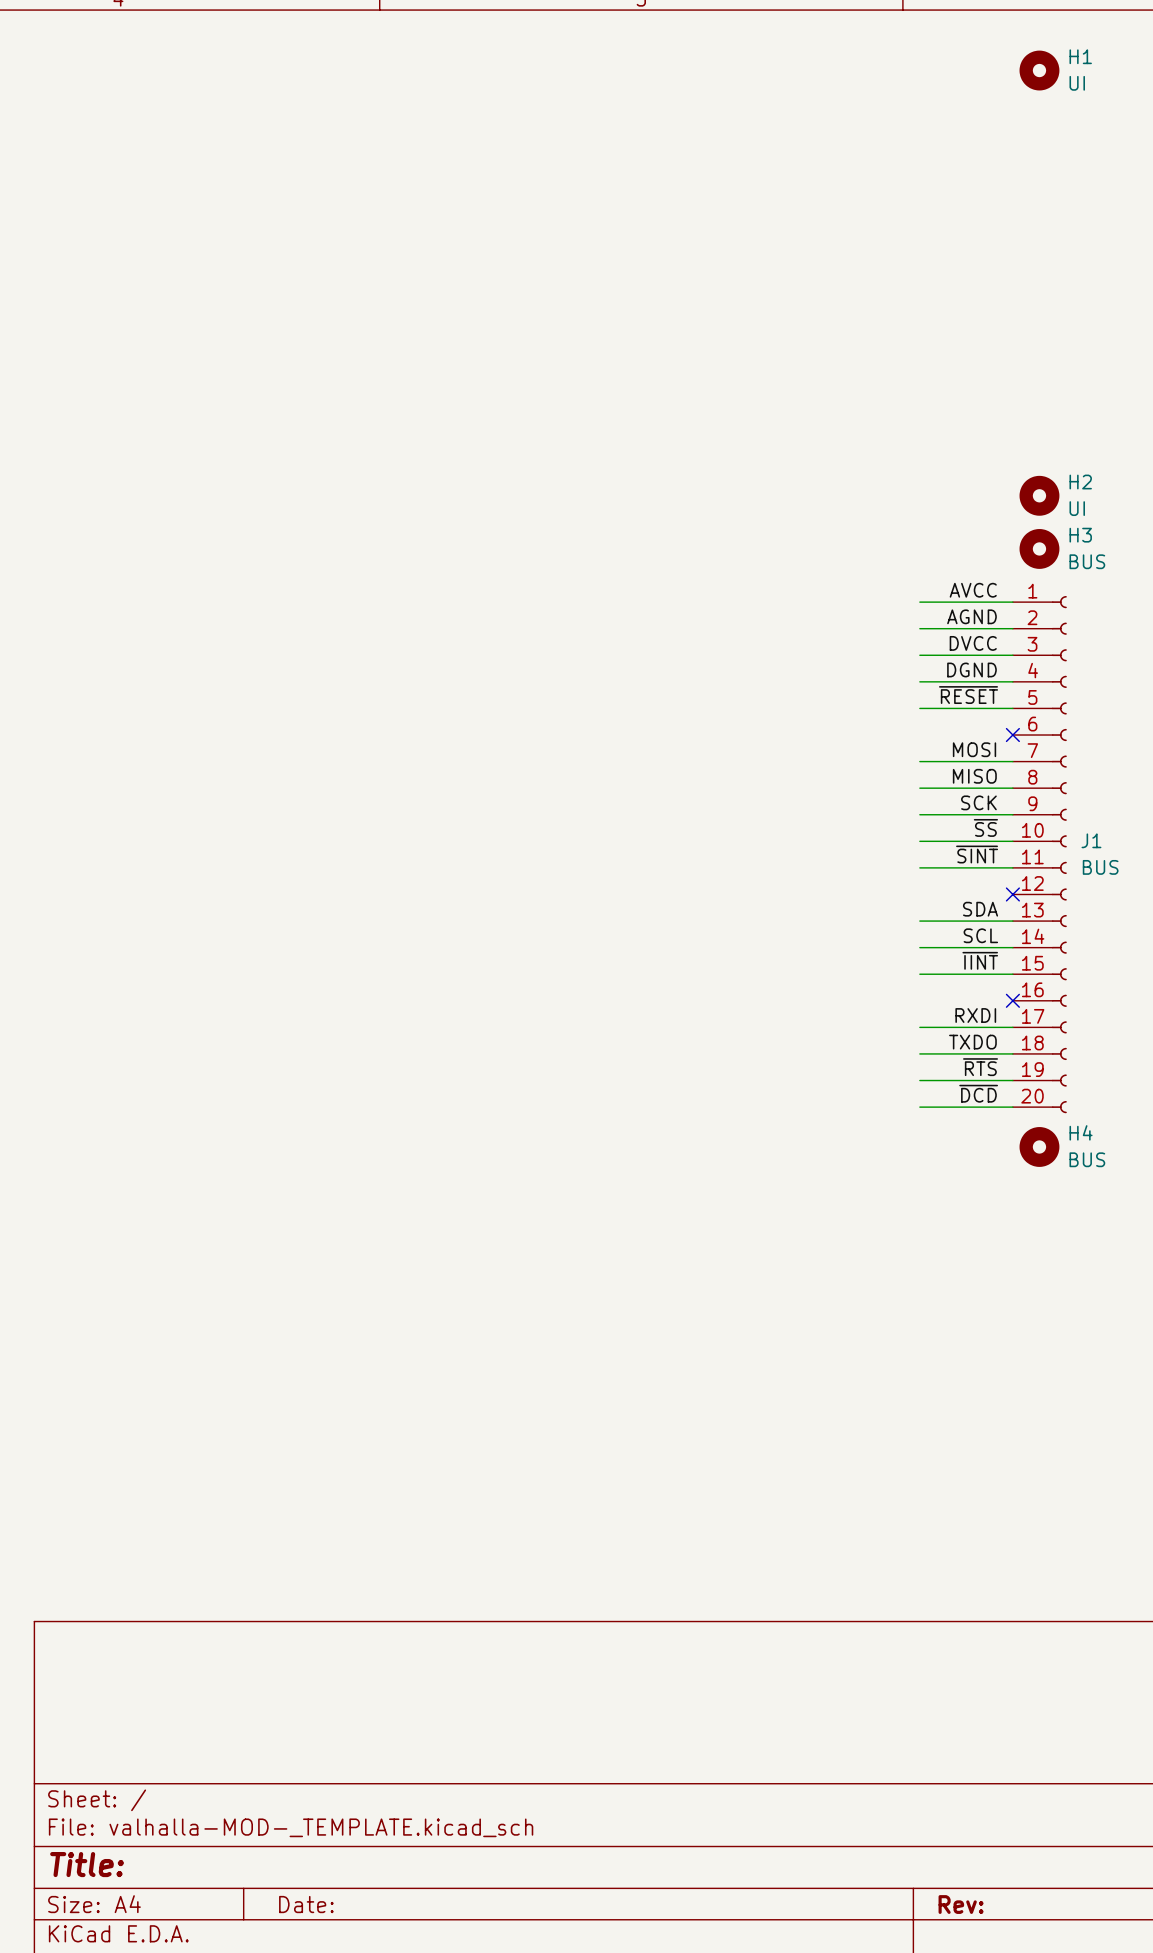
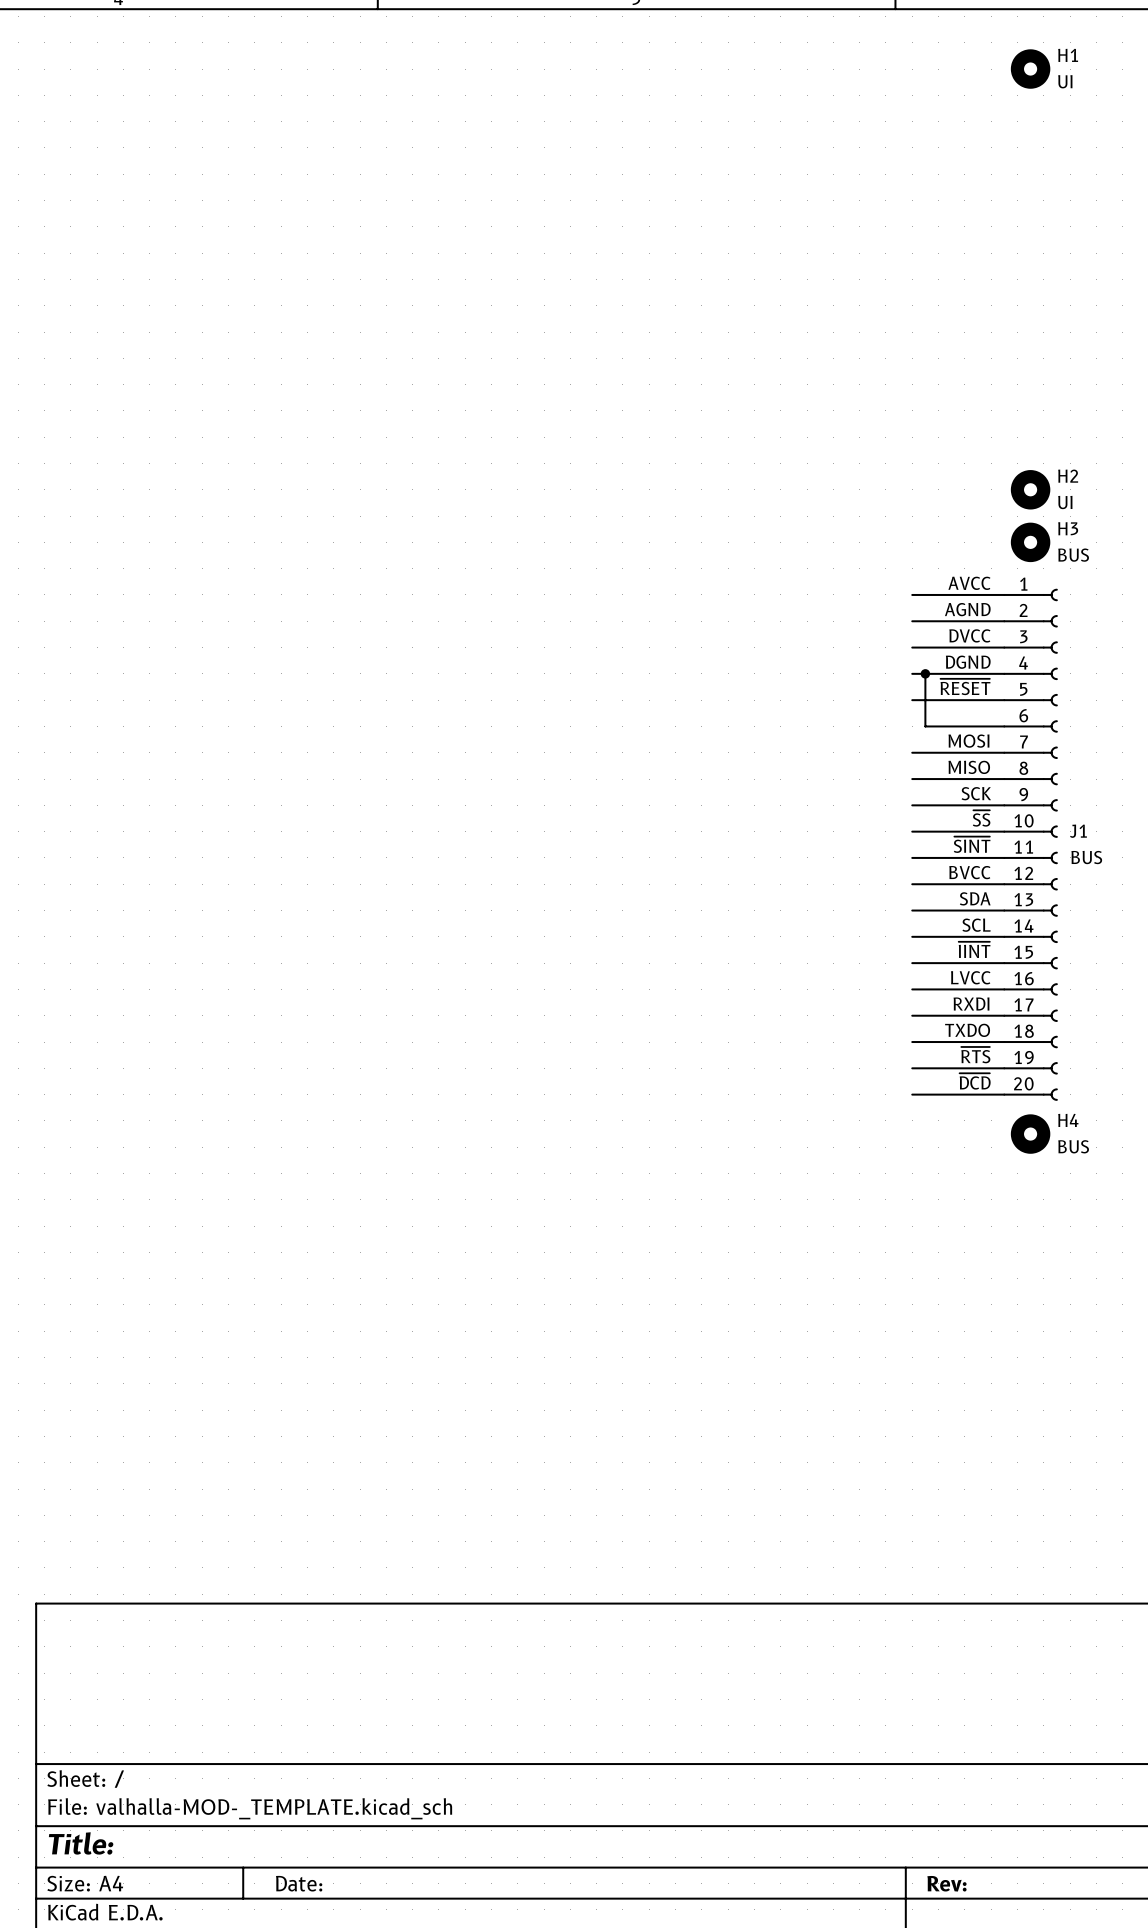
wire: none -> (925, 673) (925, 726) (1004, 726)
junction: none -> (925, 673)
no-connect mark: (1012, 735) -> none
label: none -> BVCC (969, 872)
wire: none -> (912, 884) (1004, 884)
no-connect mark: (1012, 894) -> none
label: none -> LVCC (970, 977)
wire: none -> (912, 989) (1004, 989)
no-connect mark: (1012, 1000) -> none

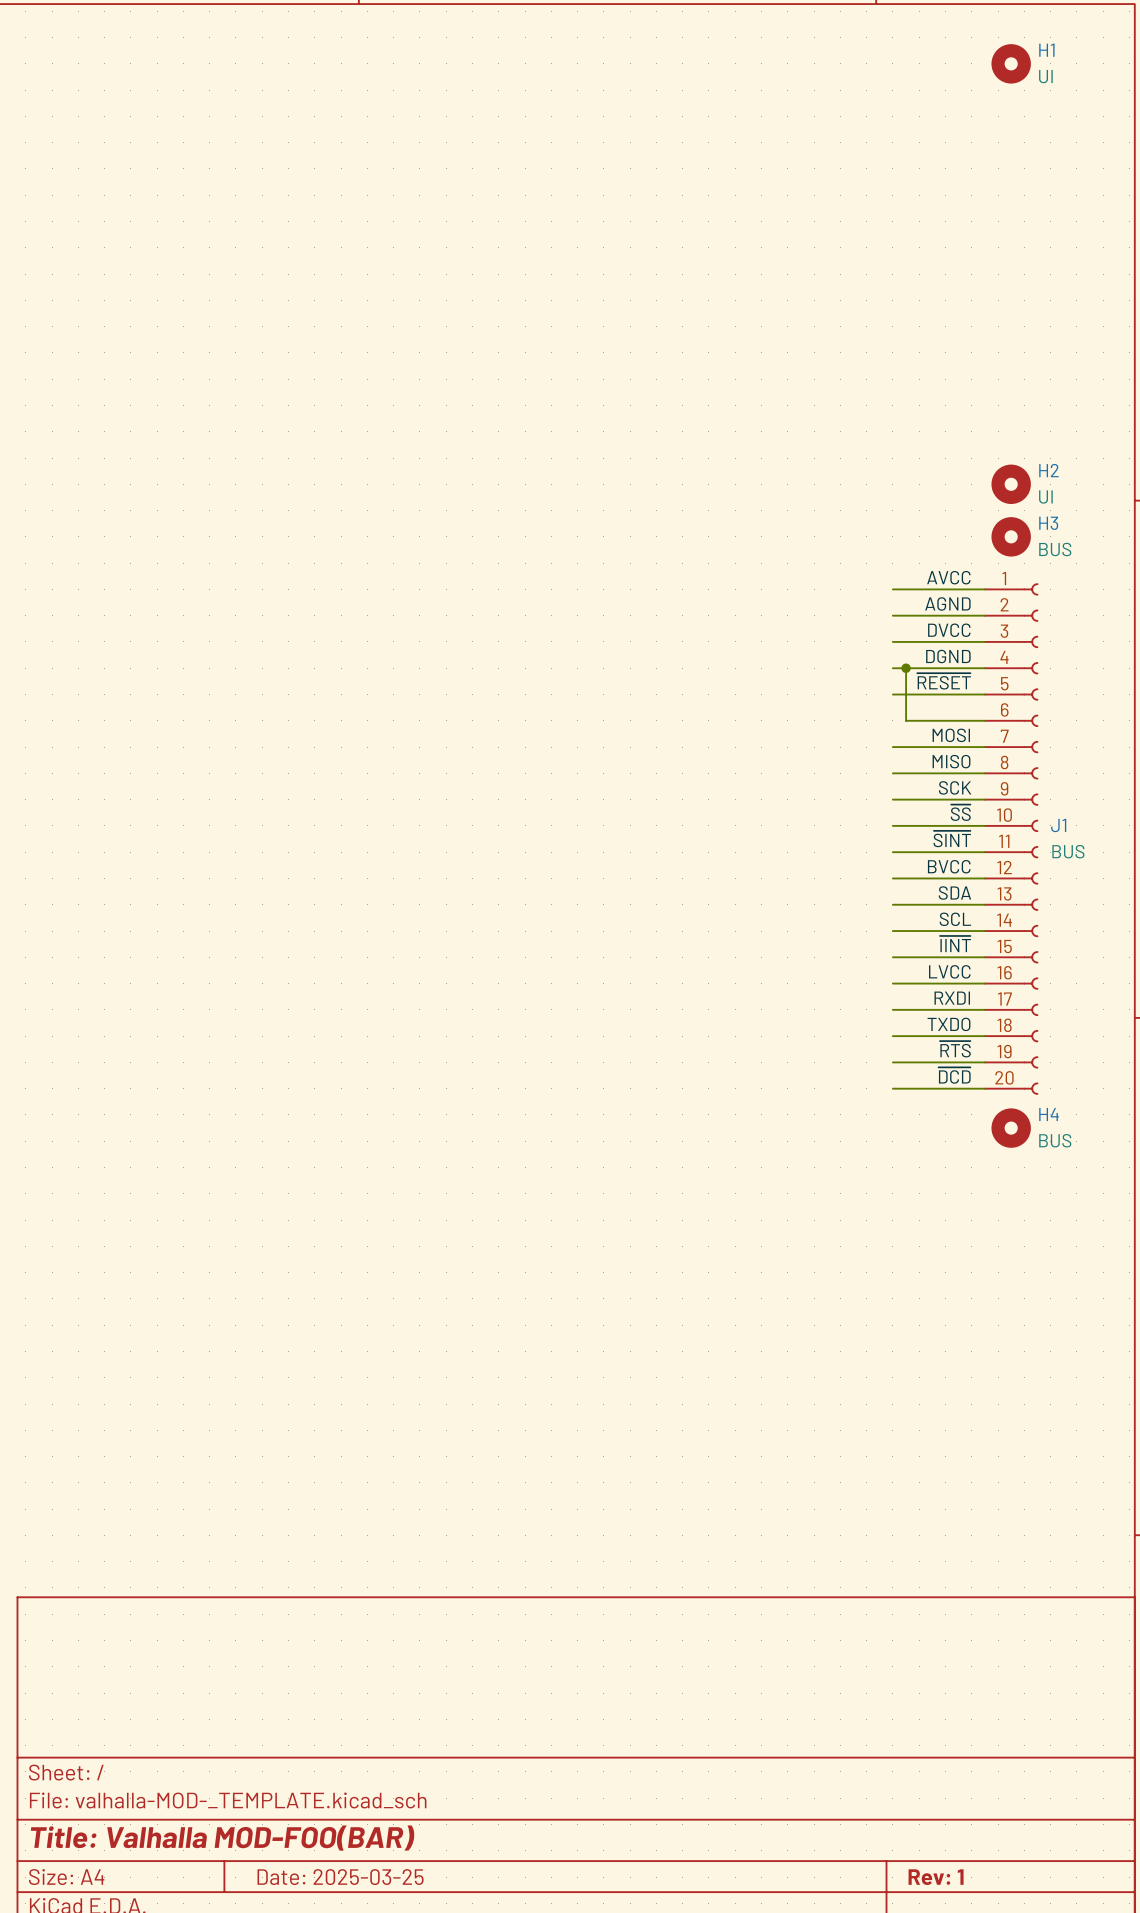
title block: Title: (81, 1843) -> Title: Valhalla MOD-FOO(BAR) (222, 1838)
title block: Date: (299, 1883) -> Date: 2025-03-25 (340, 1877)
title block: Rev: (946, 1883) -> Rev: 1 (936, 1877)

